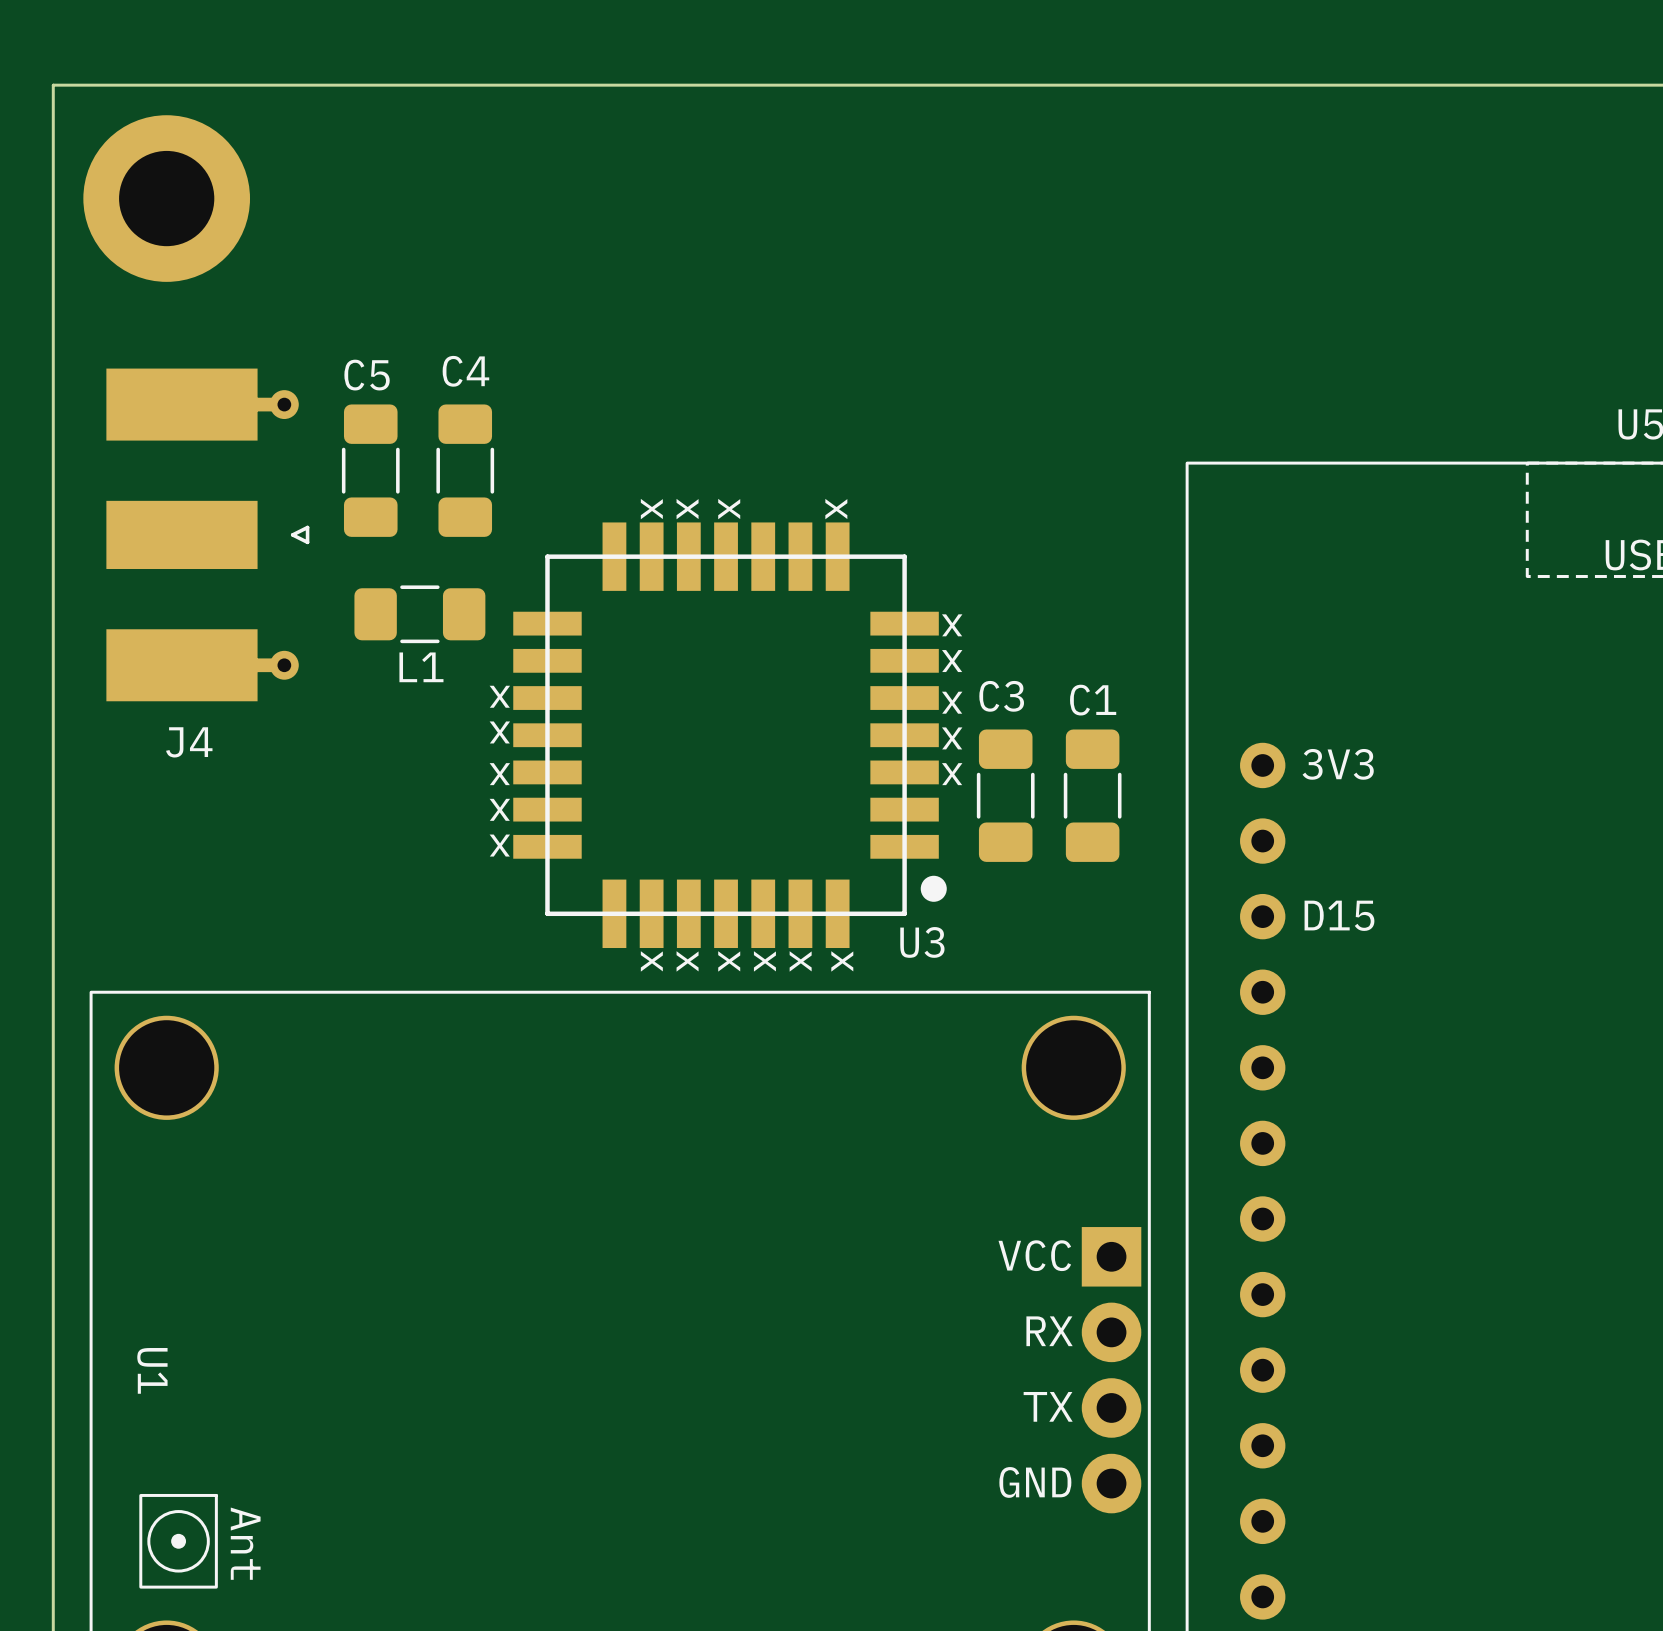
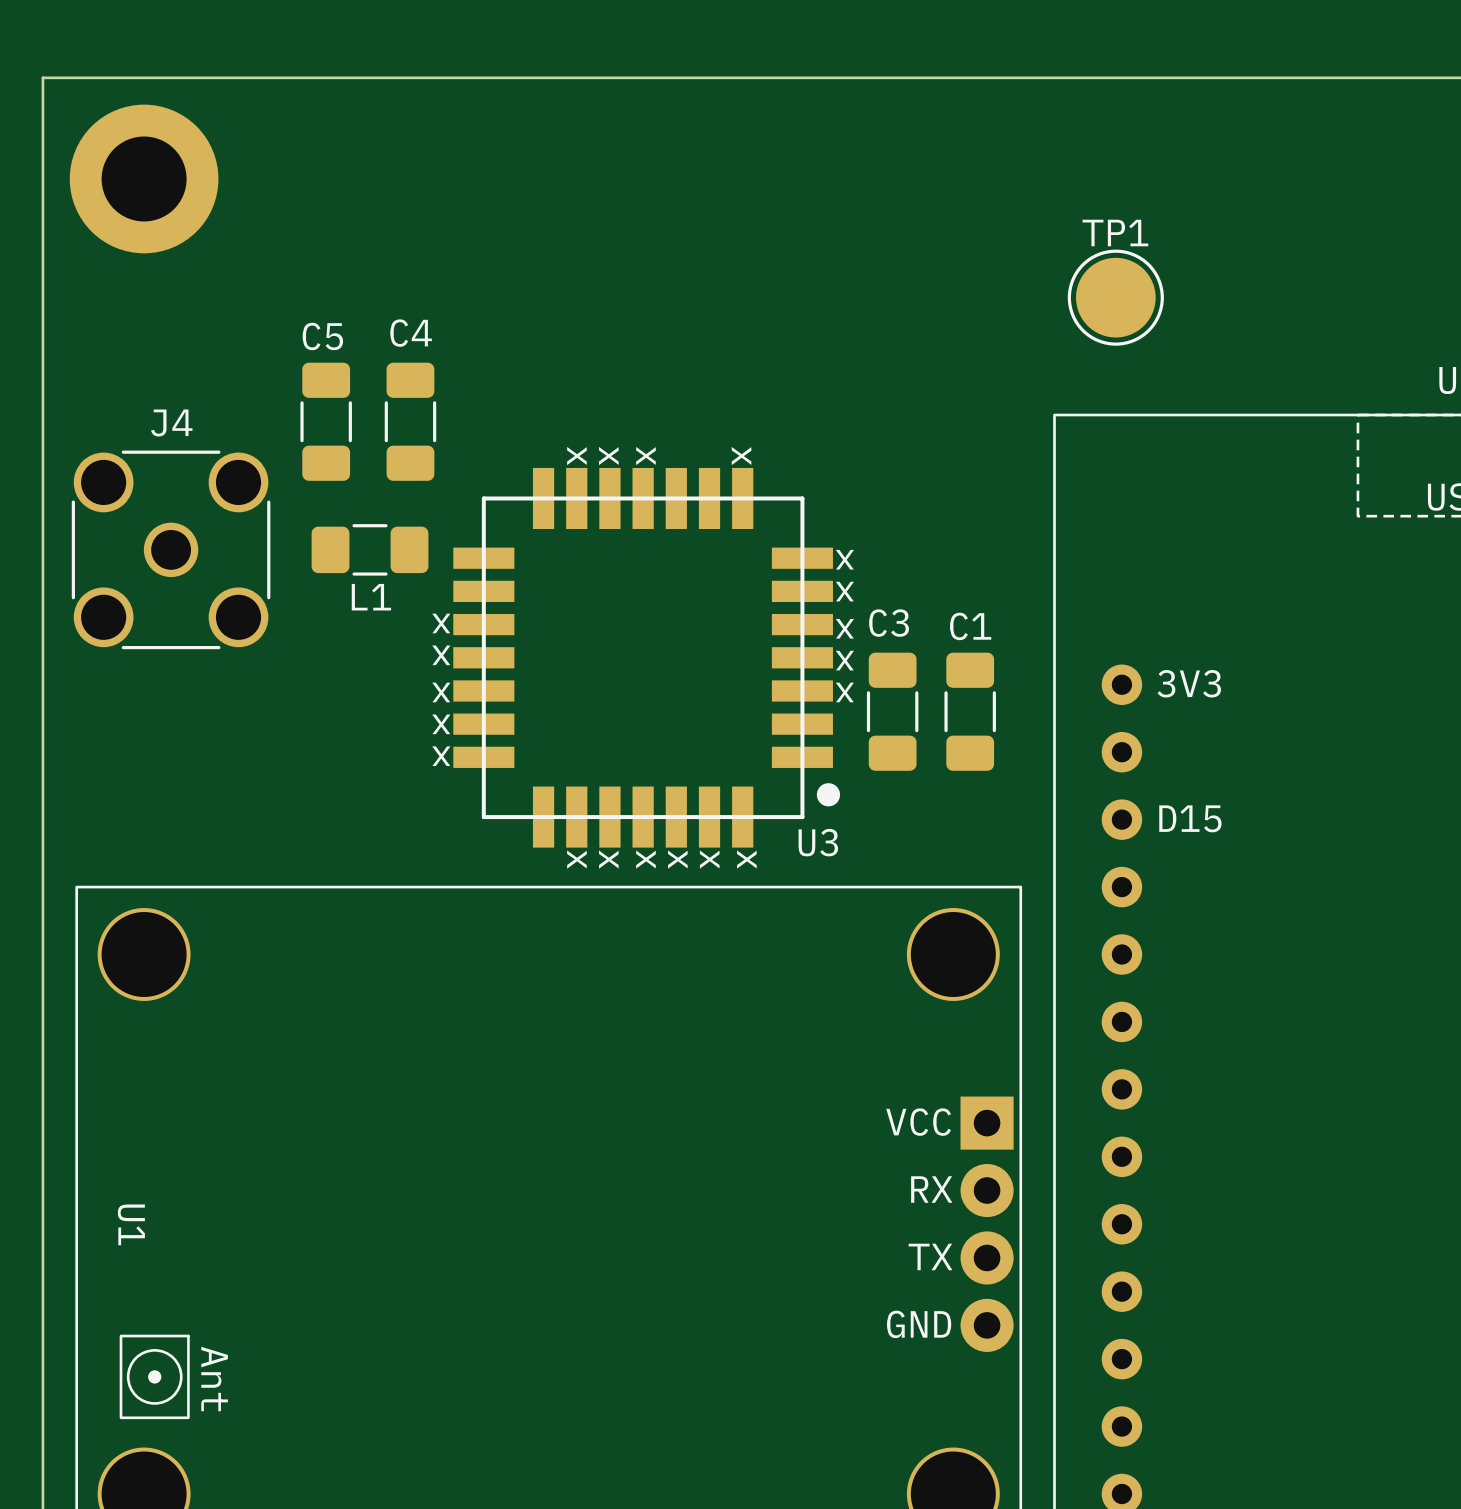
TP1: none -> (1115, 297)
J4 footprint: [106, 368, 310, 702] -> [71, 450, 271, 650]
J4 name position: J4 (189, 742) -> J4 (171, 423)

